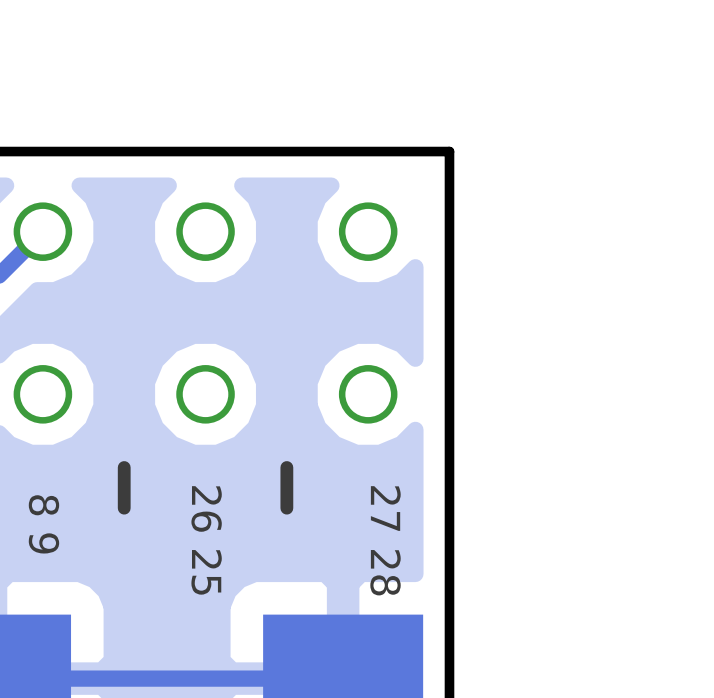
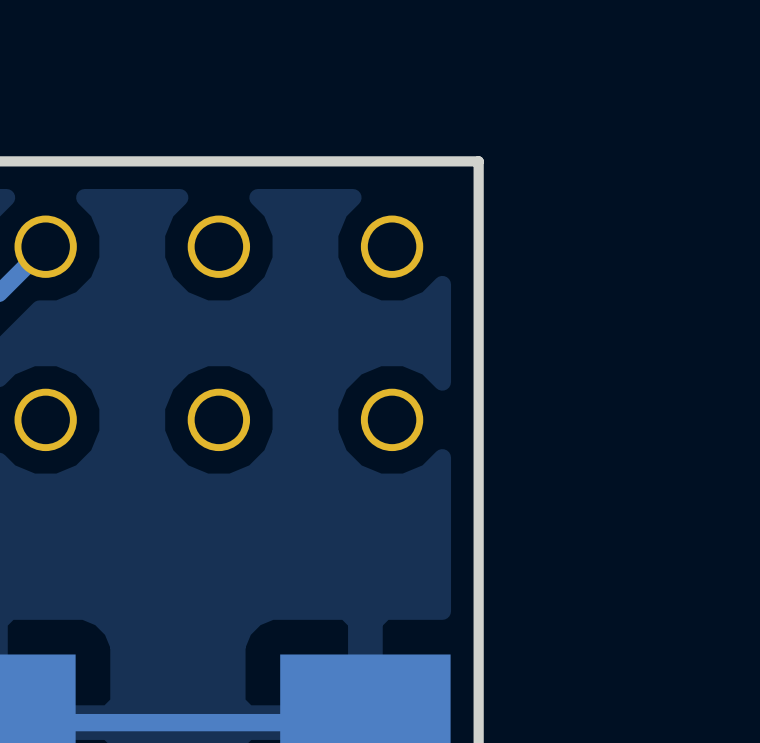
line: (124, 467) (124, 508) -> none
line: (286, 467) (286, 508) -> none
text: 8 9 (43, 524) -> none
text: 26 25 (206, 540) -> none
text: 27 28 (385, 540) -> none

